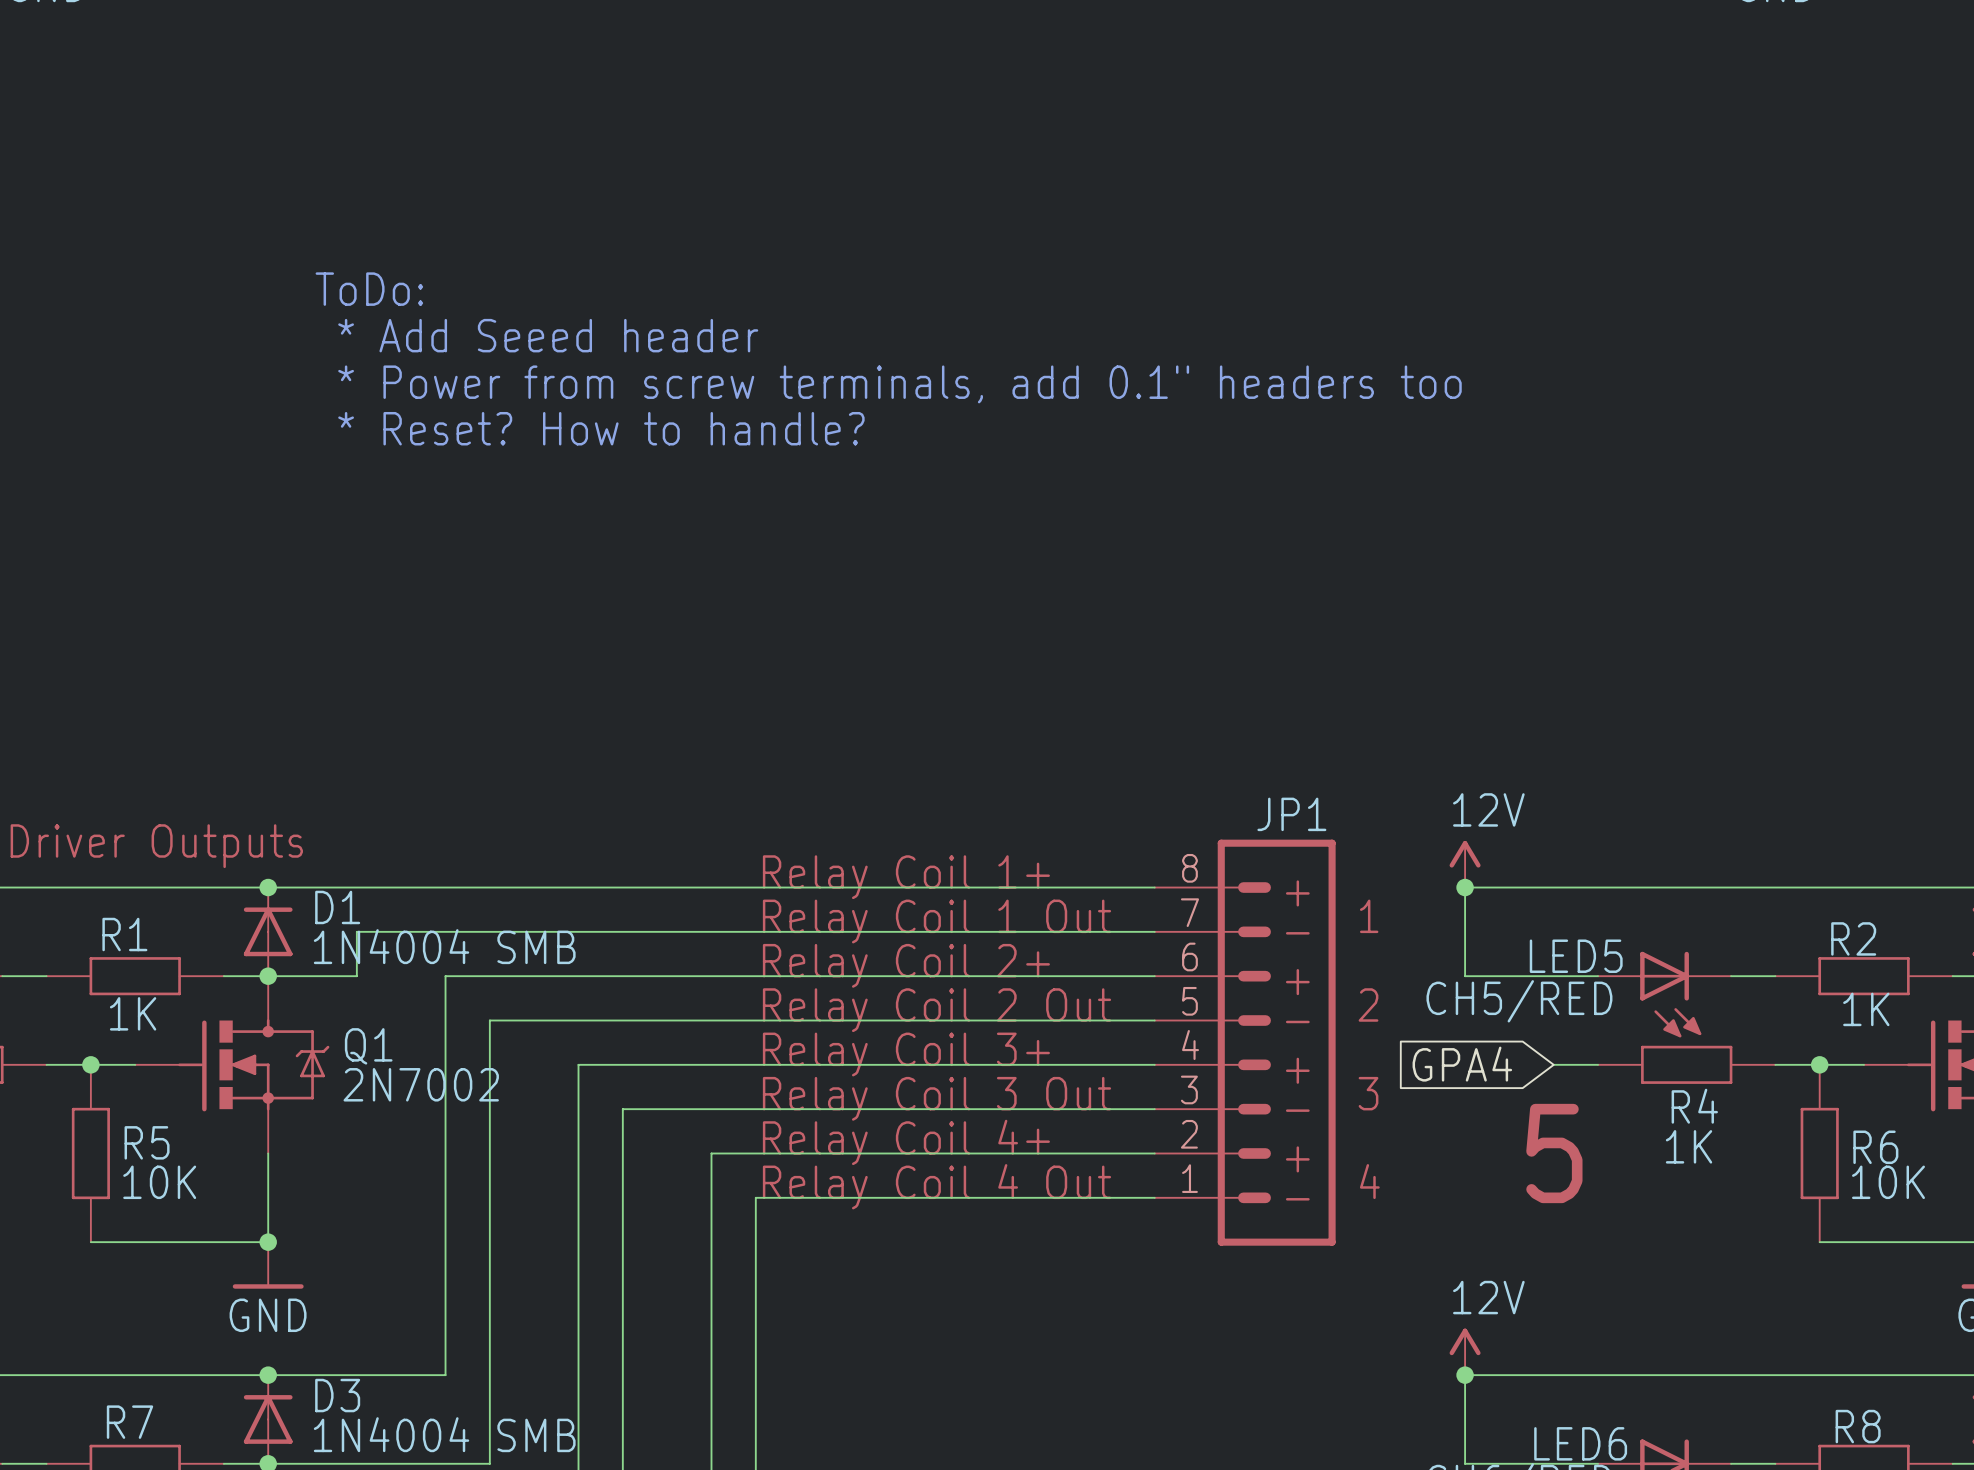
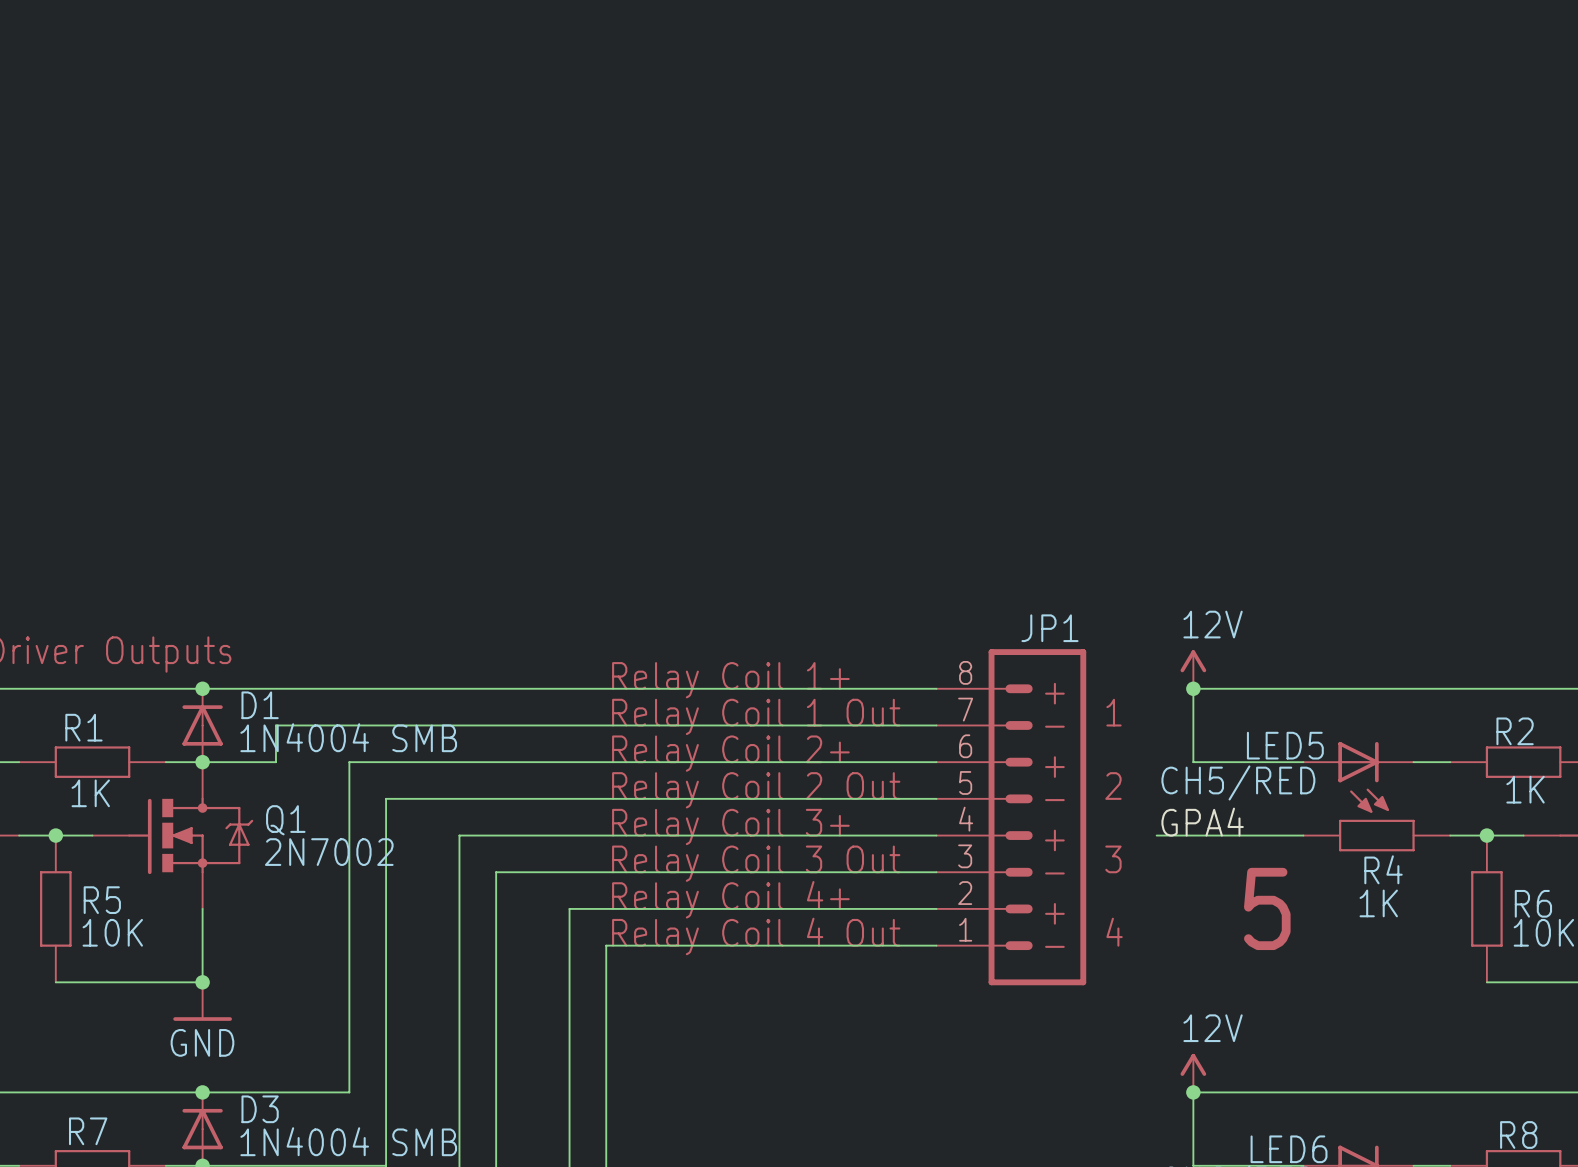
text: ToDo: (369, 289) -> none
text: * Add Seeed header (548, 335) -> none
text: * Power from screw terminals, add 0.1" headers too (899, 384) -> none
text: * Reset? How to handle? (601, 428) -> none
label: none -> GPA4 (1202, 822)
wire: none -> (1156, 835) (1266, 835)
global label: GPA4 (1462, 1064) -> none

